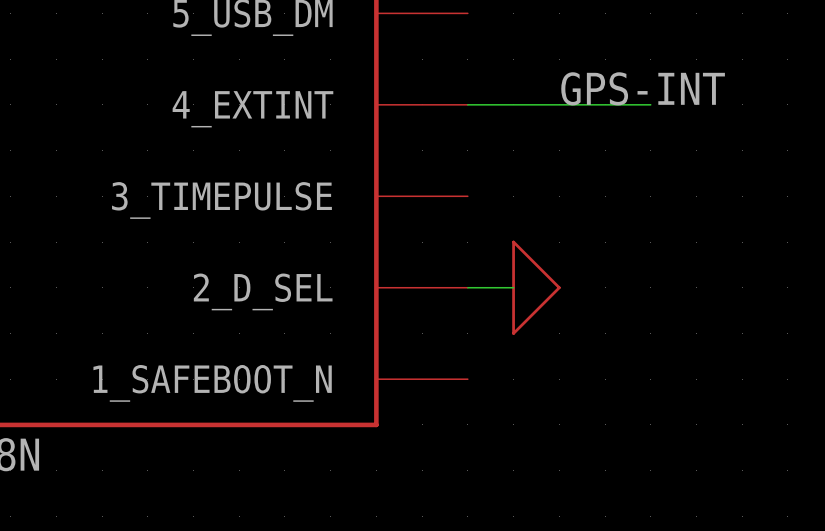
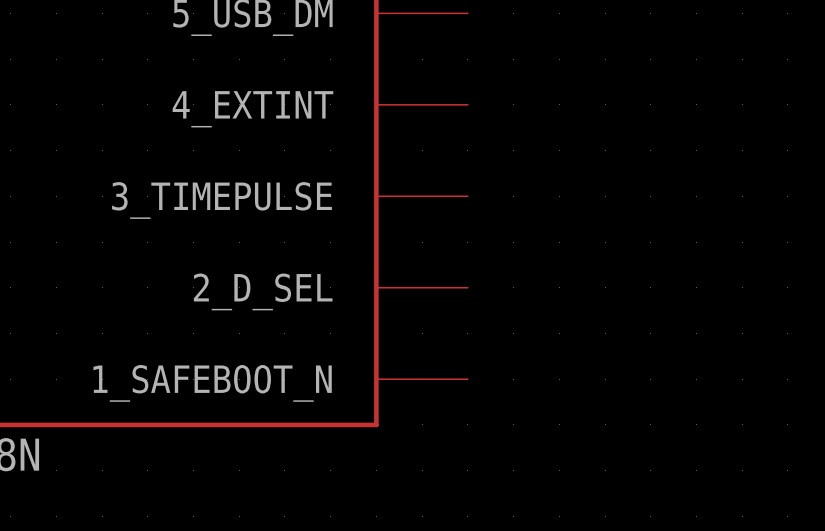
label: GPS-INT (643, 88) -> none
wire: (467, 104) (650, 104) -> none
wire: (467, 287) (513, 287) -> none
power symbol: (536, 287) -> none

